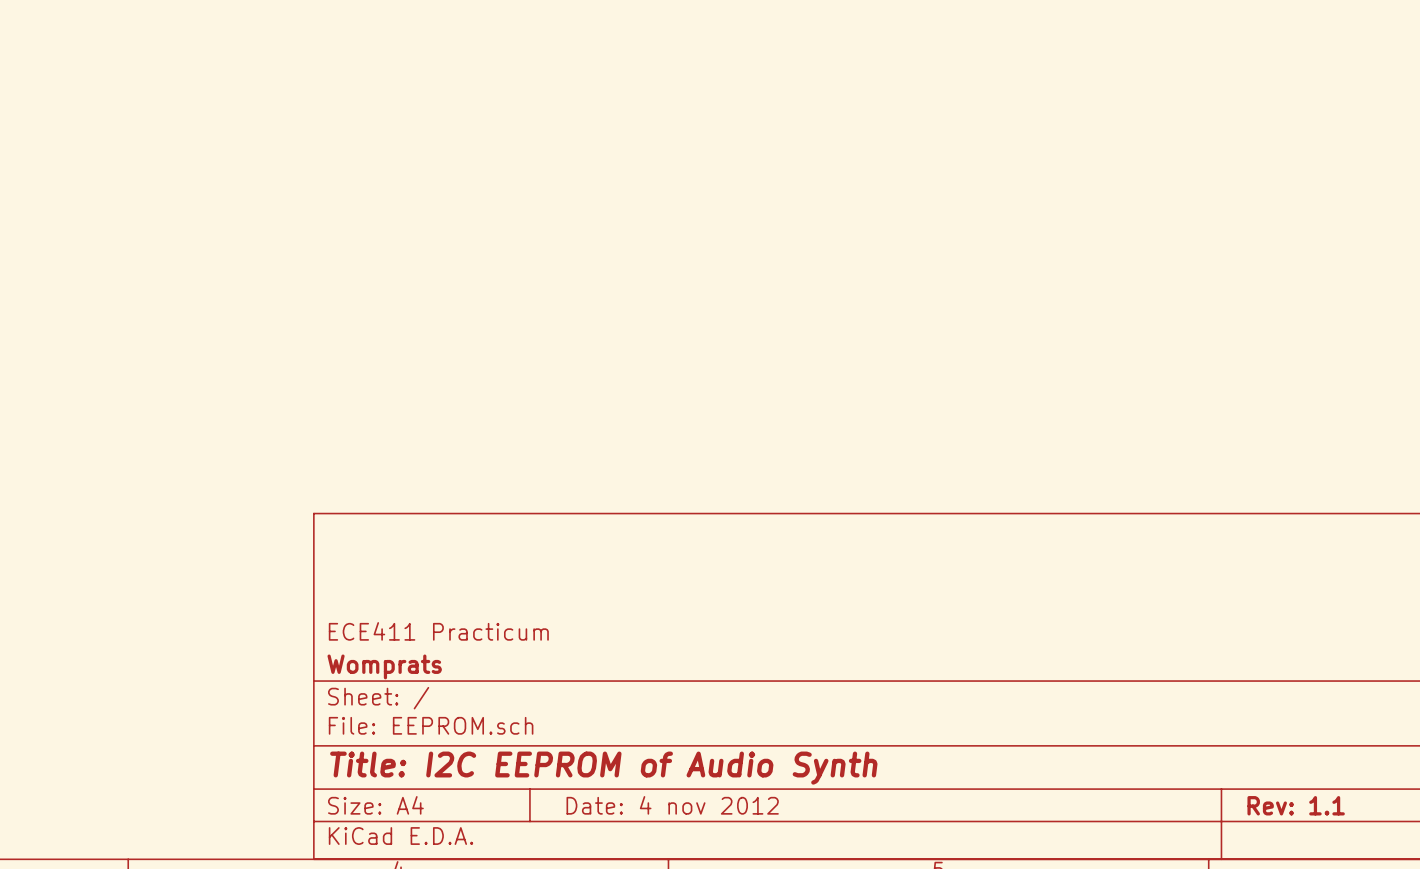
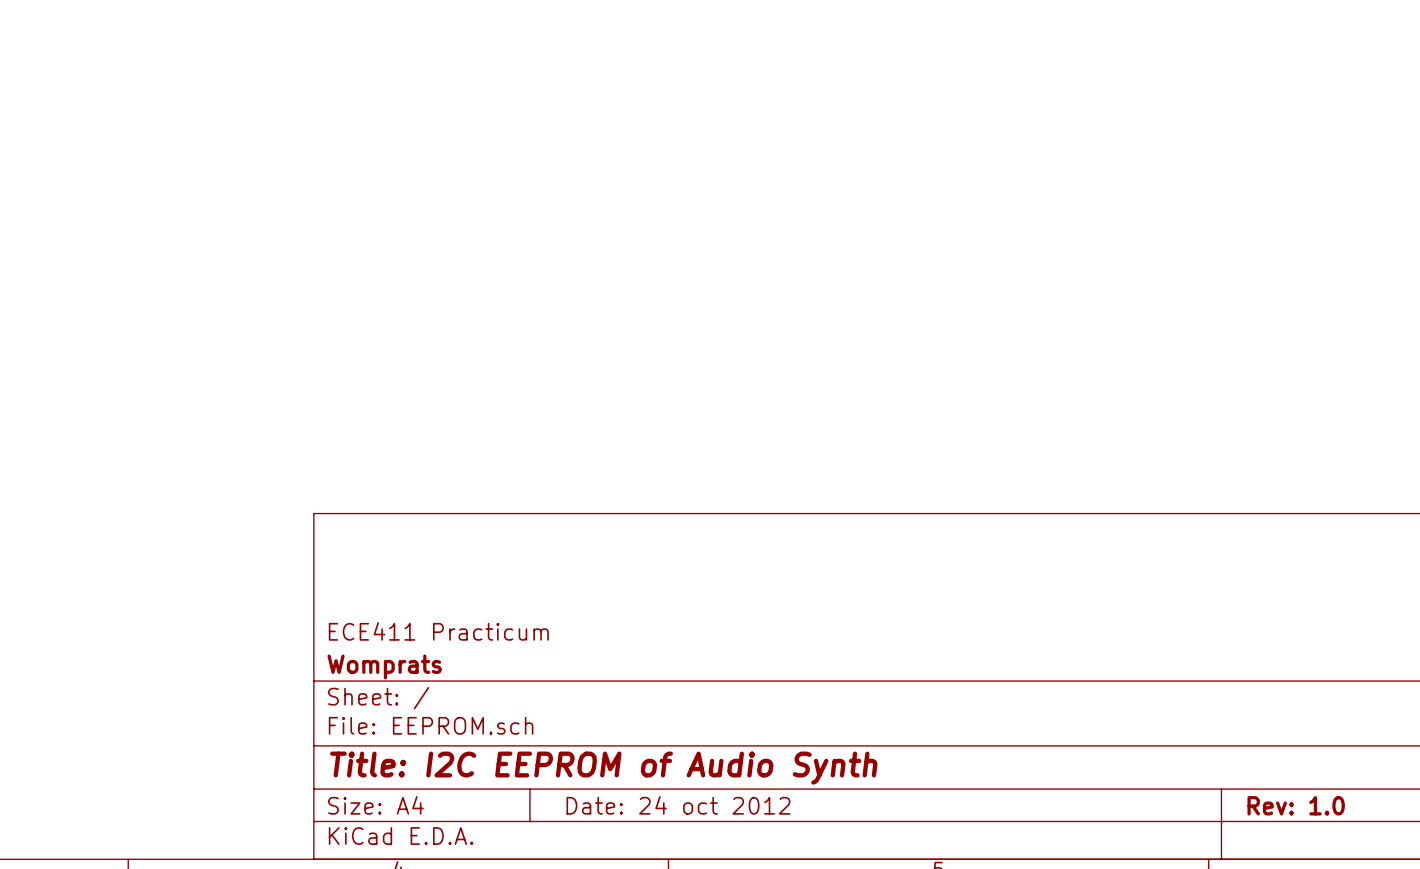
title block: Date: 4 nov 2012 (672, 805) -> Date: 24 oct 2012 (678, 805)
title block: Rev: 1.1 (1296, 805) -> Rev: 1.0 (1296, 805)

